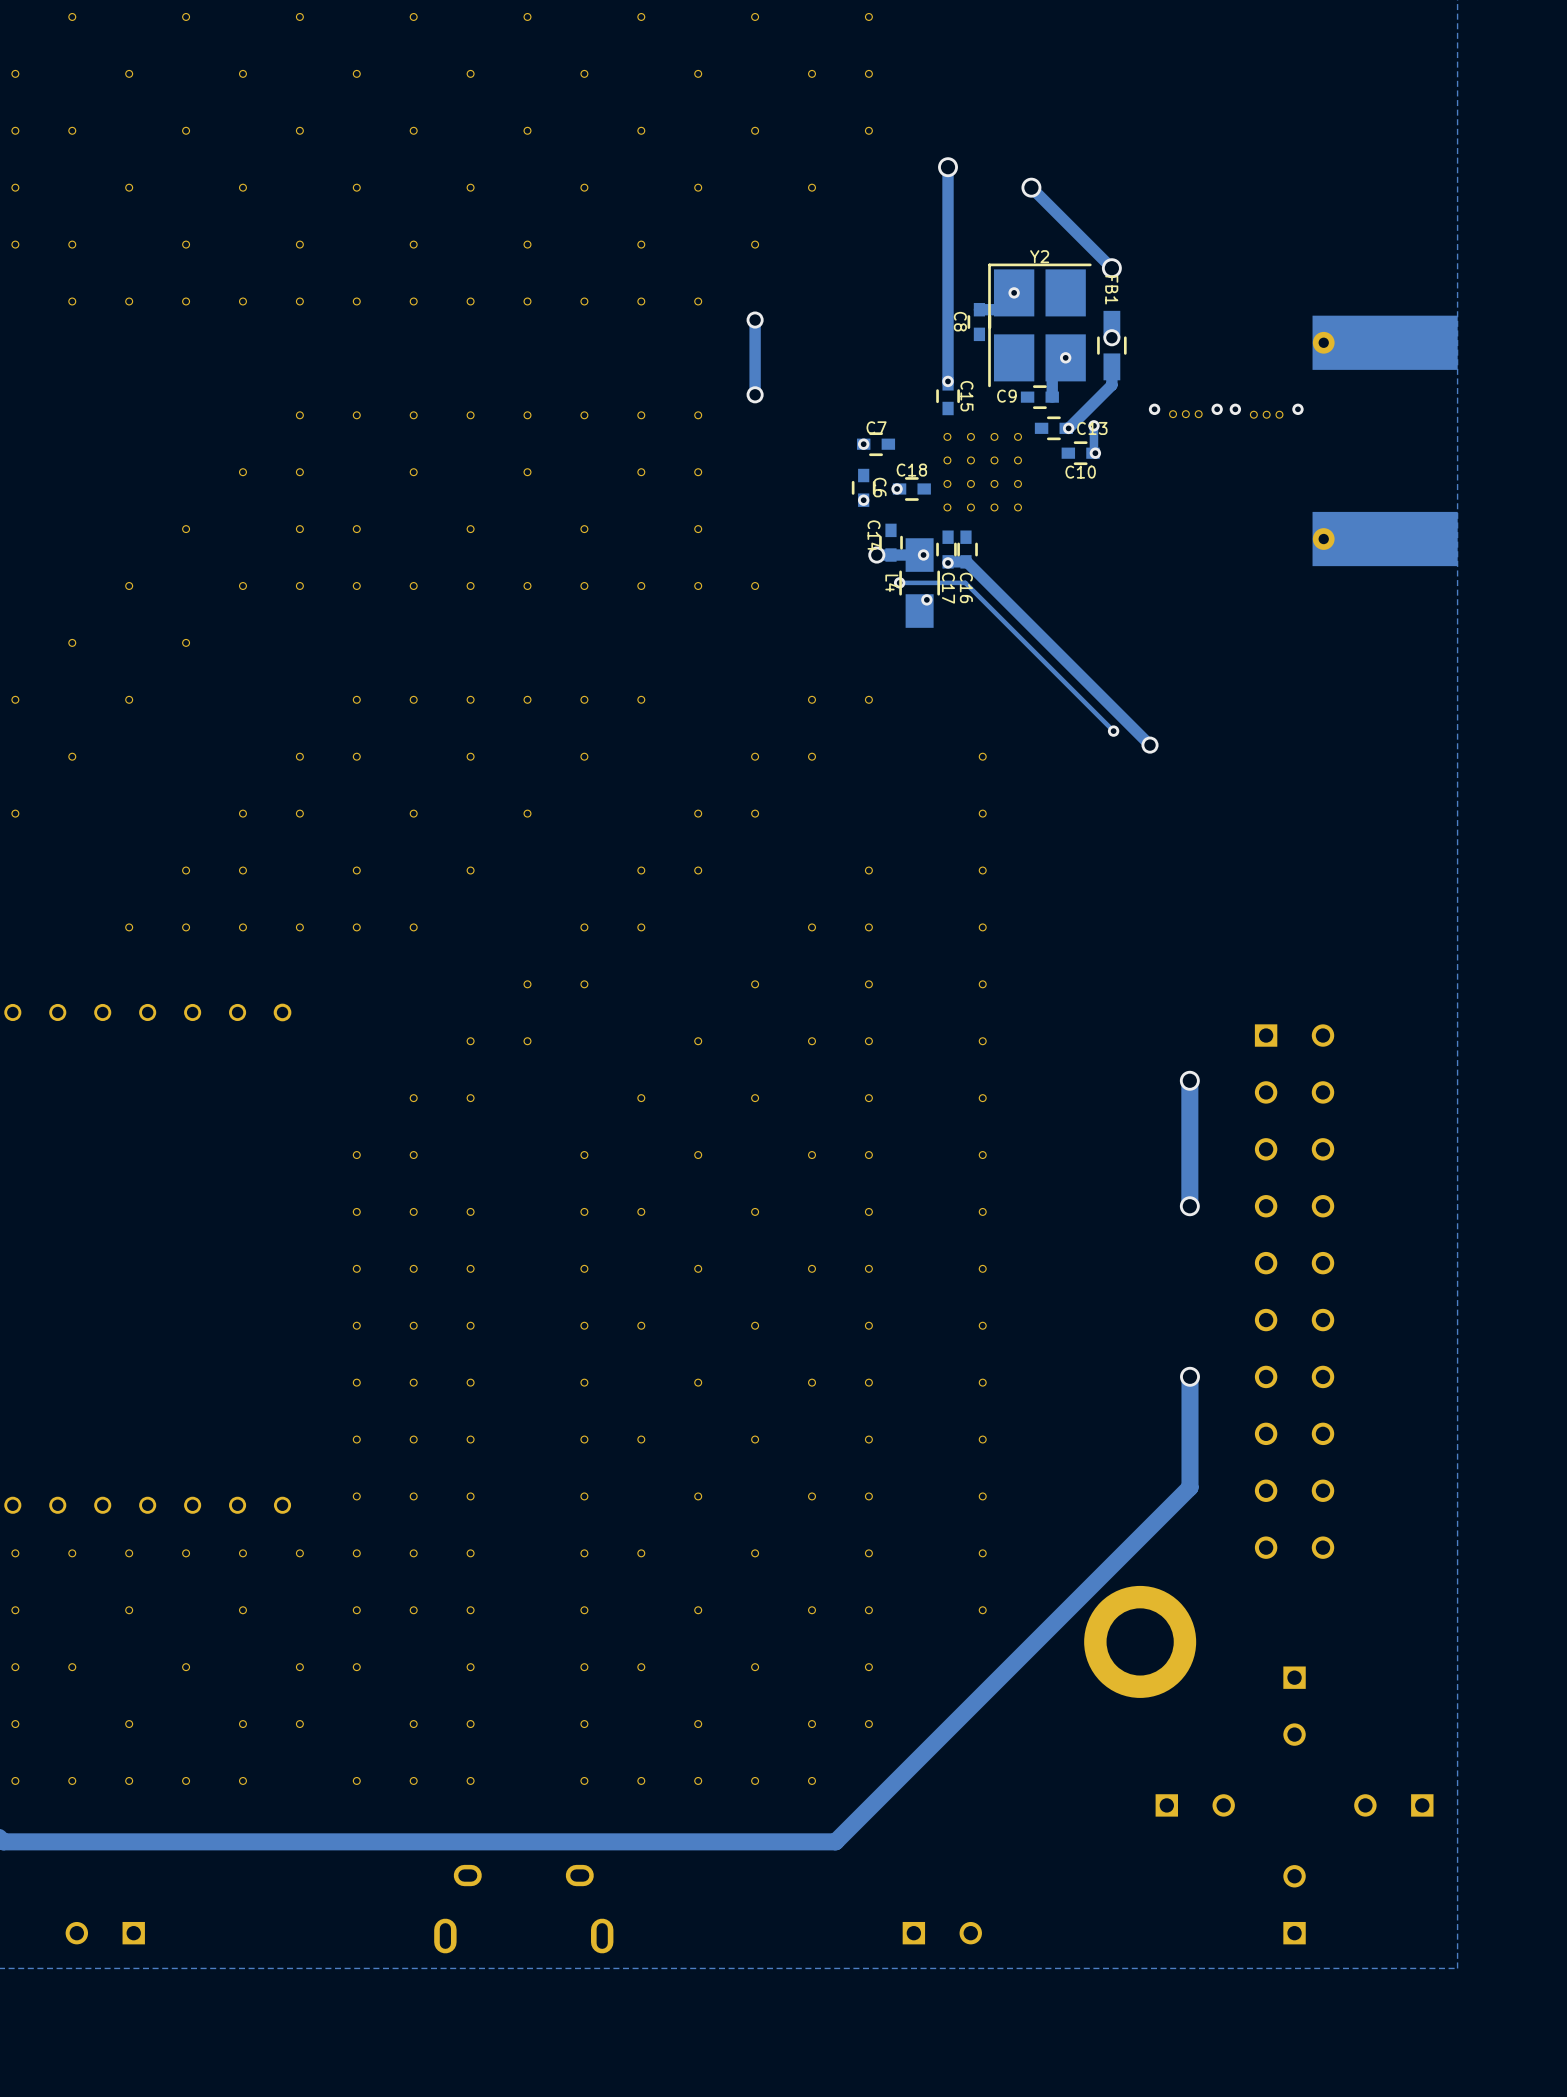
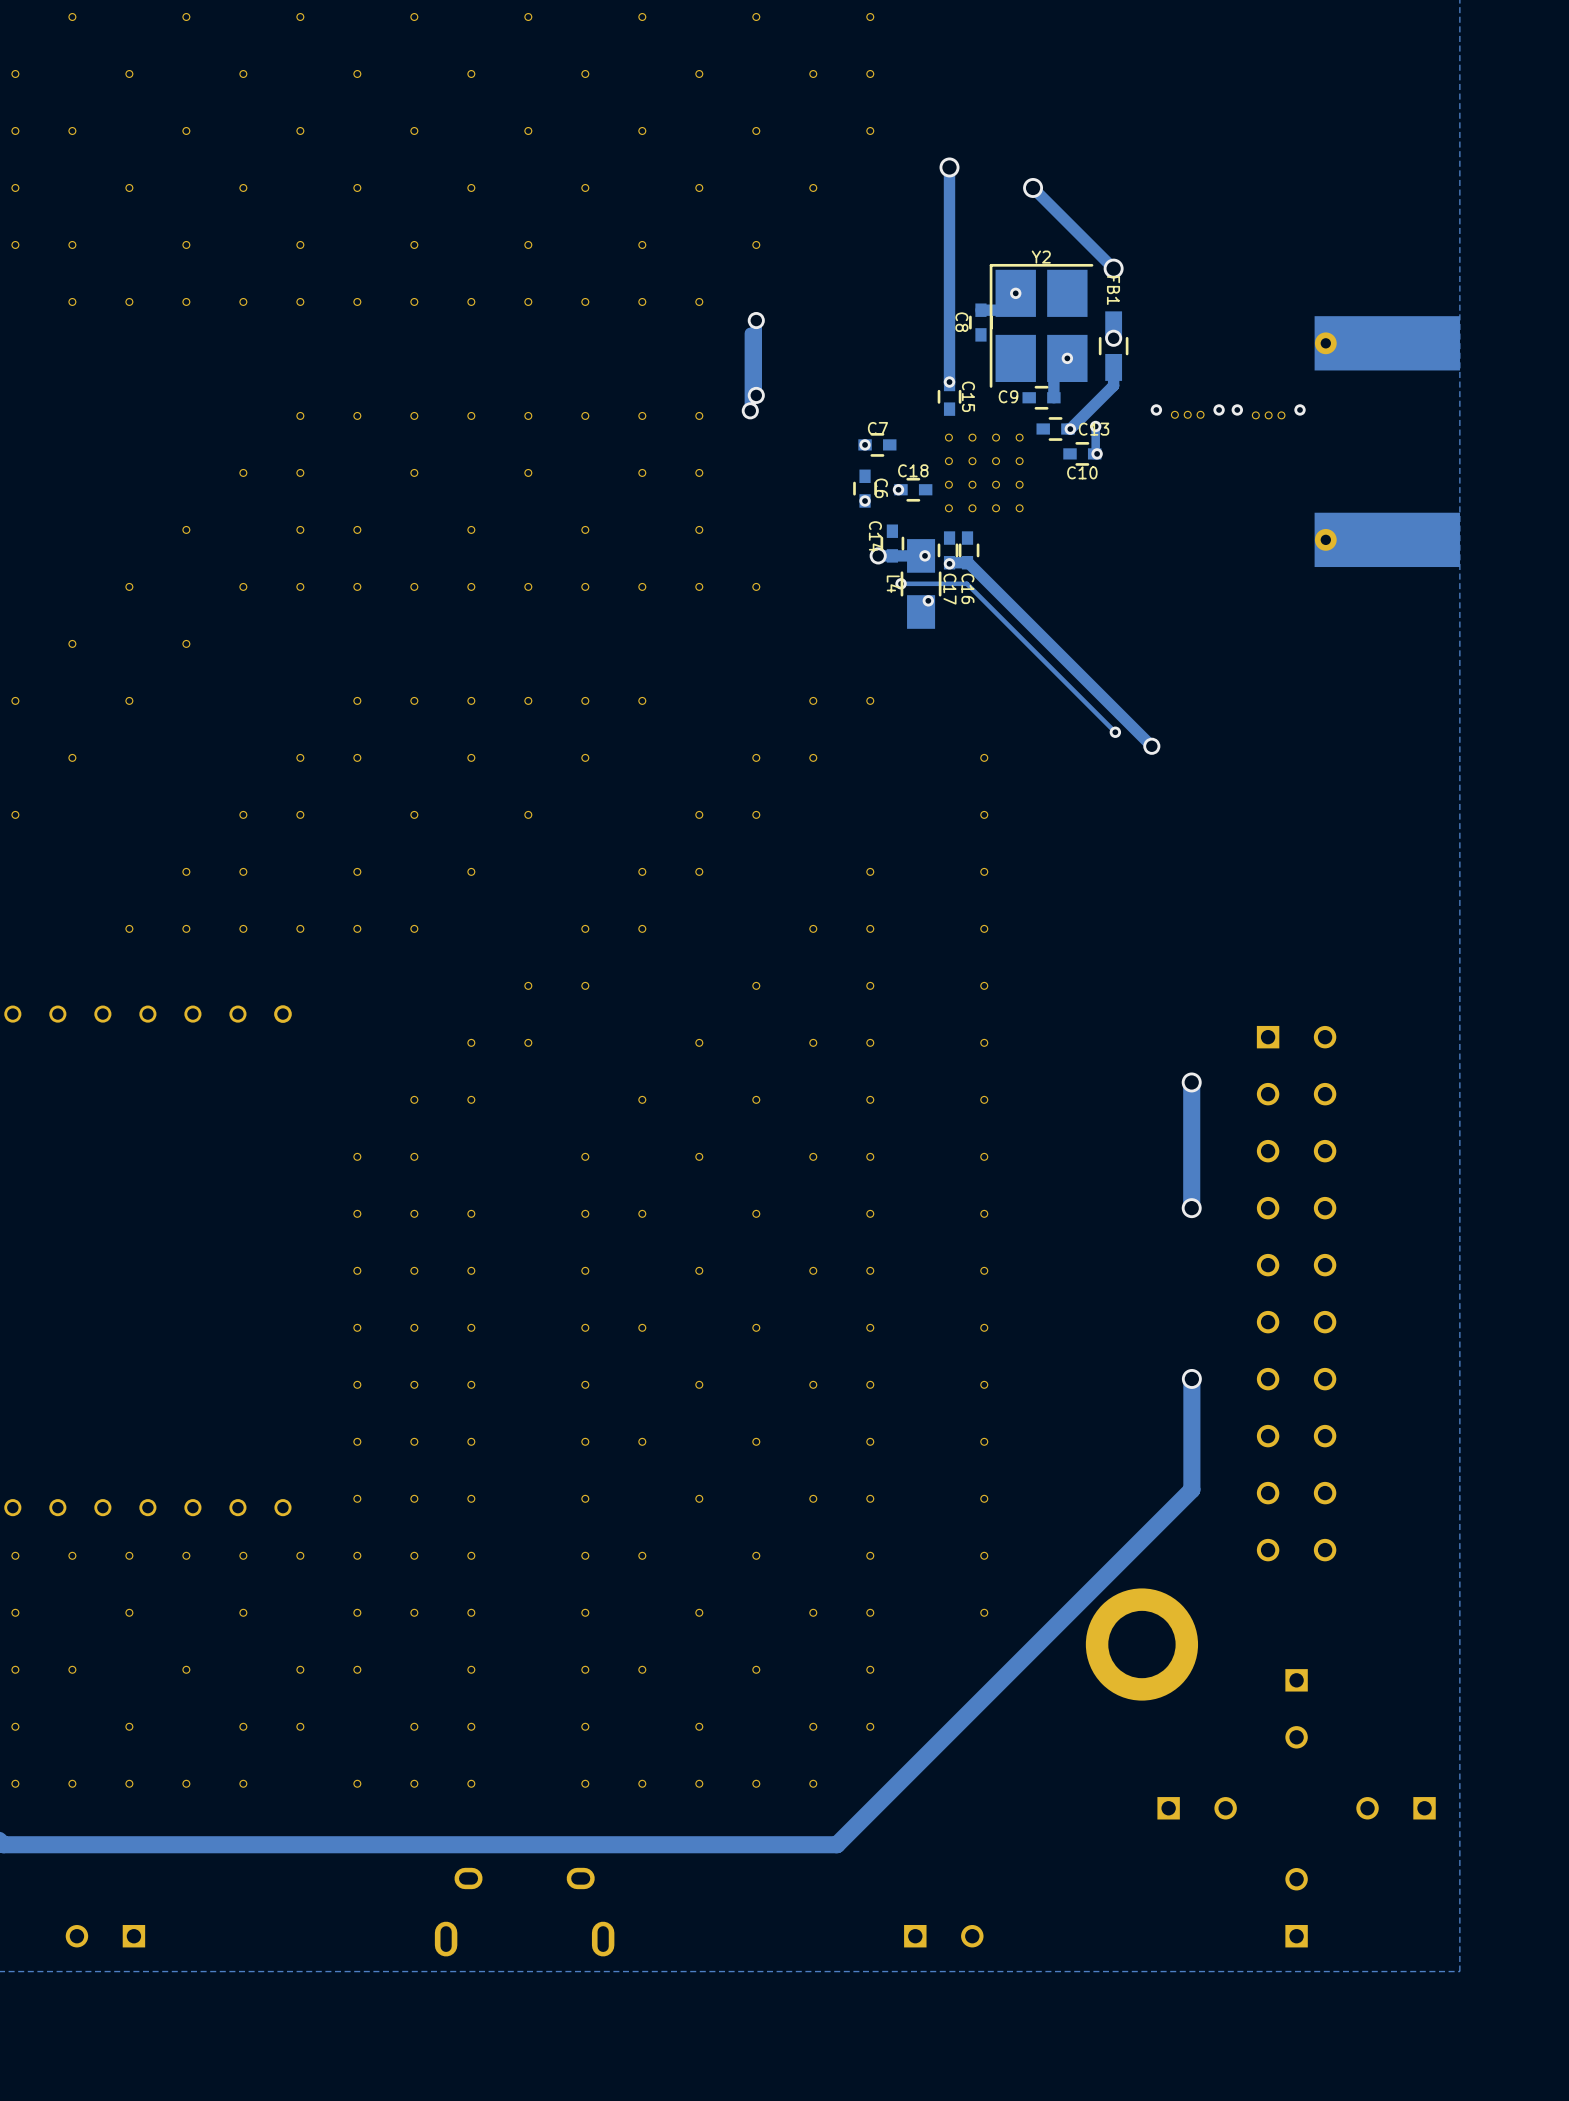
track: none -> (750, 333) (750, 410)
via: none -> (750, 410)

